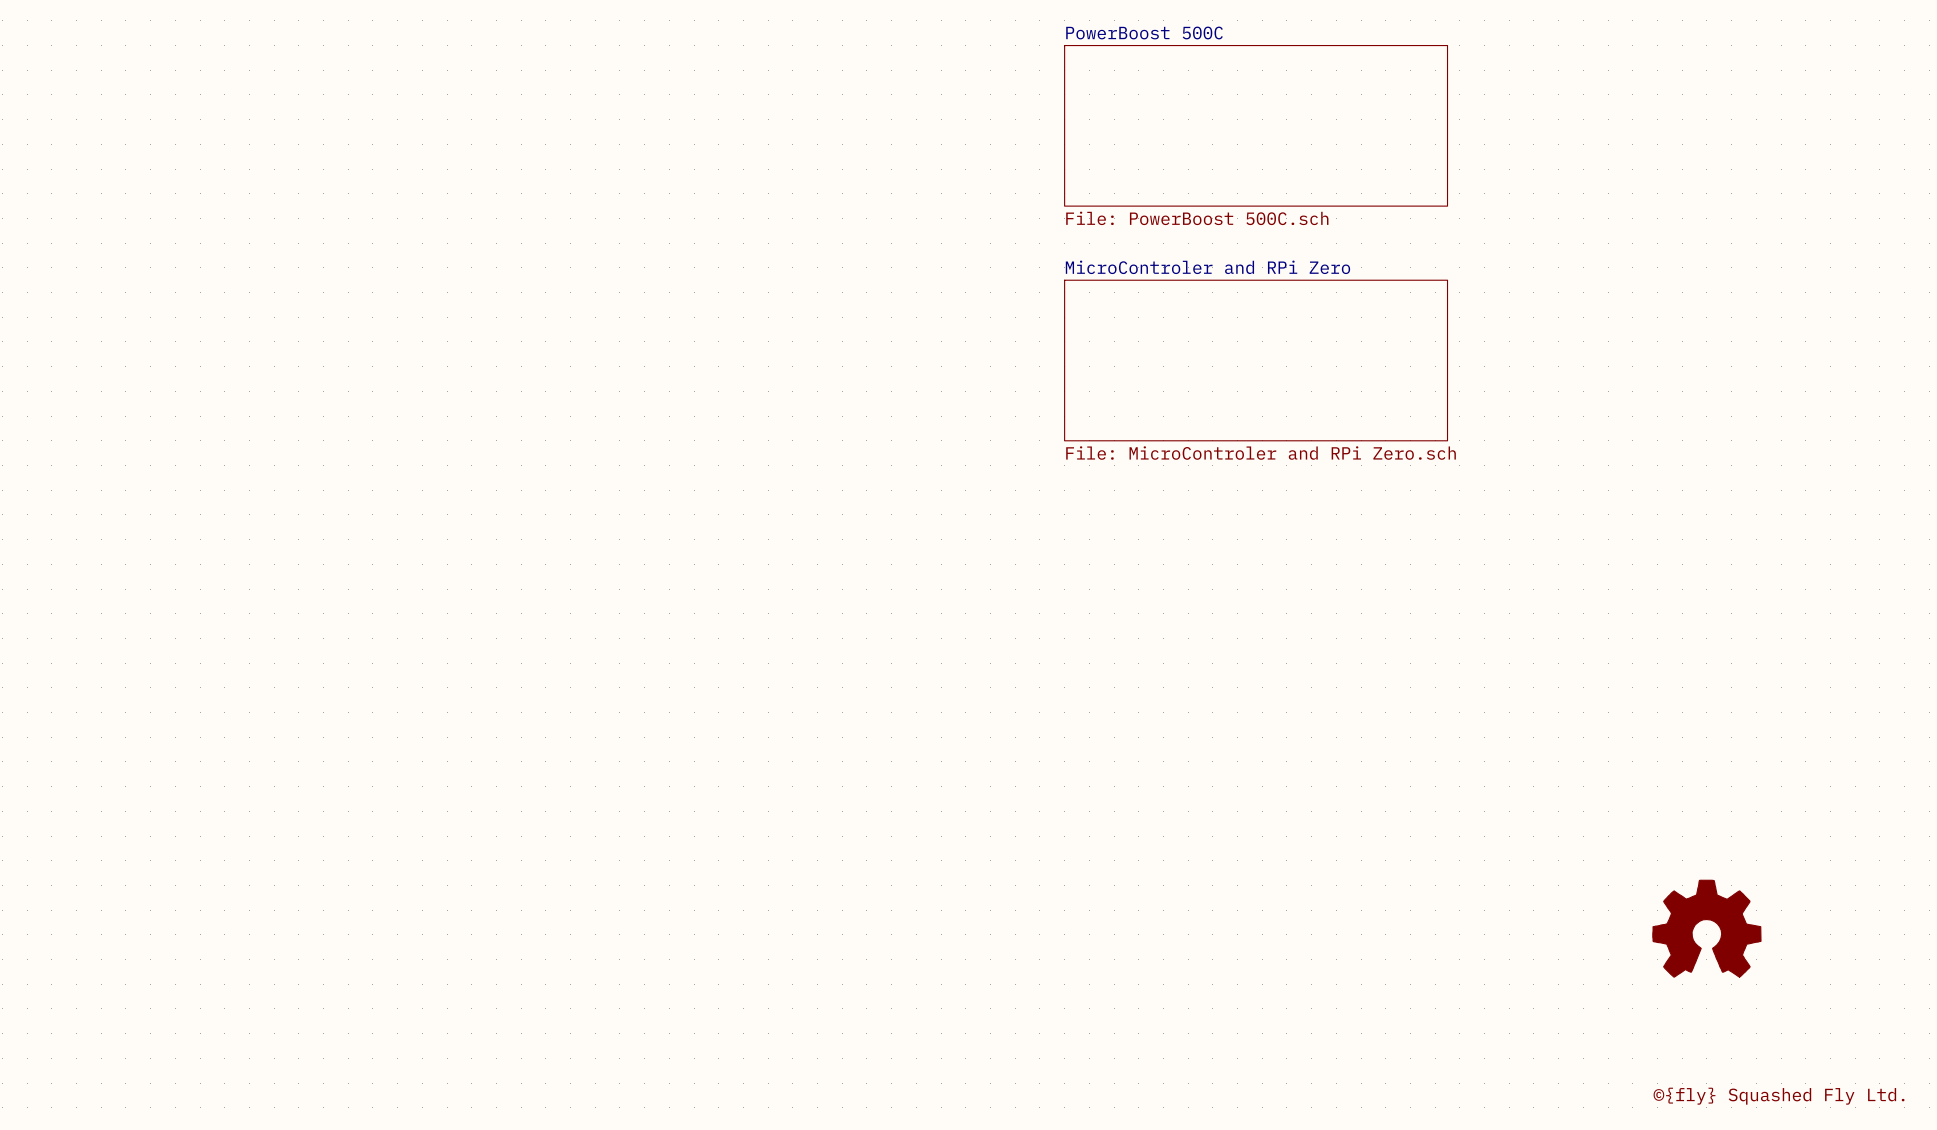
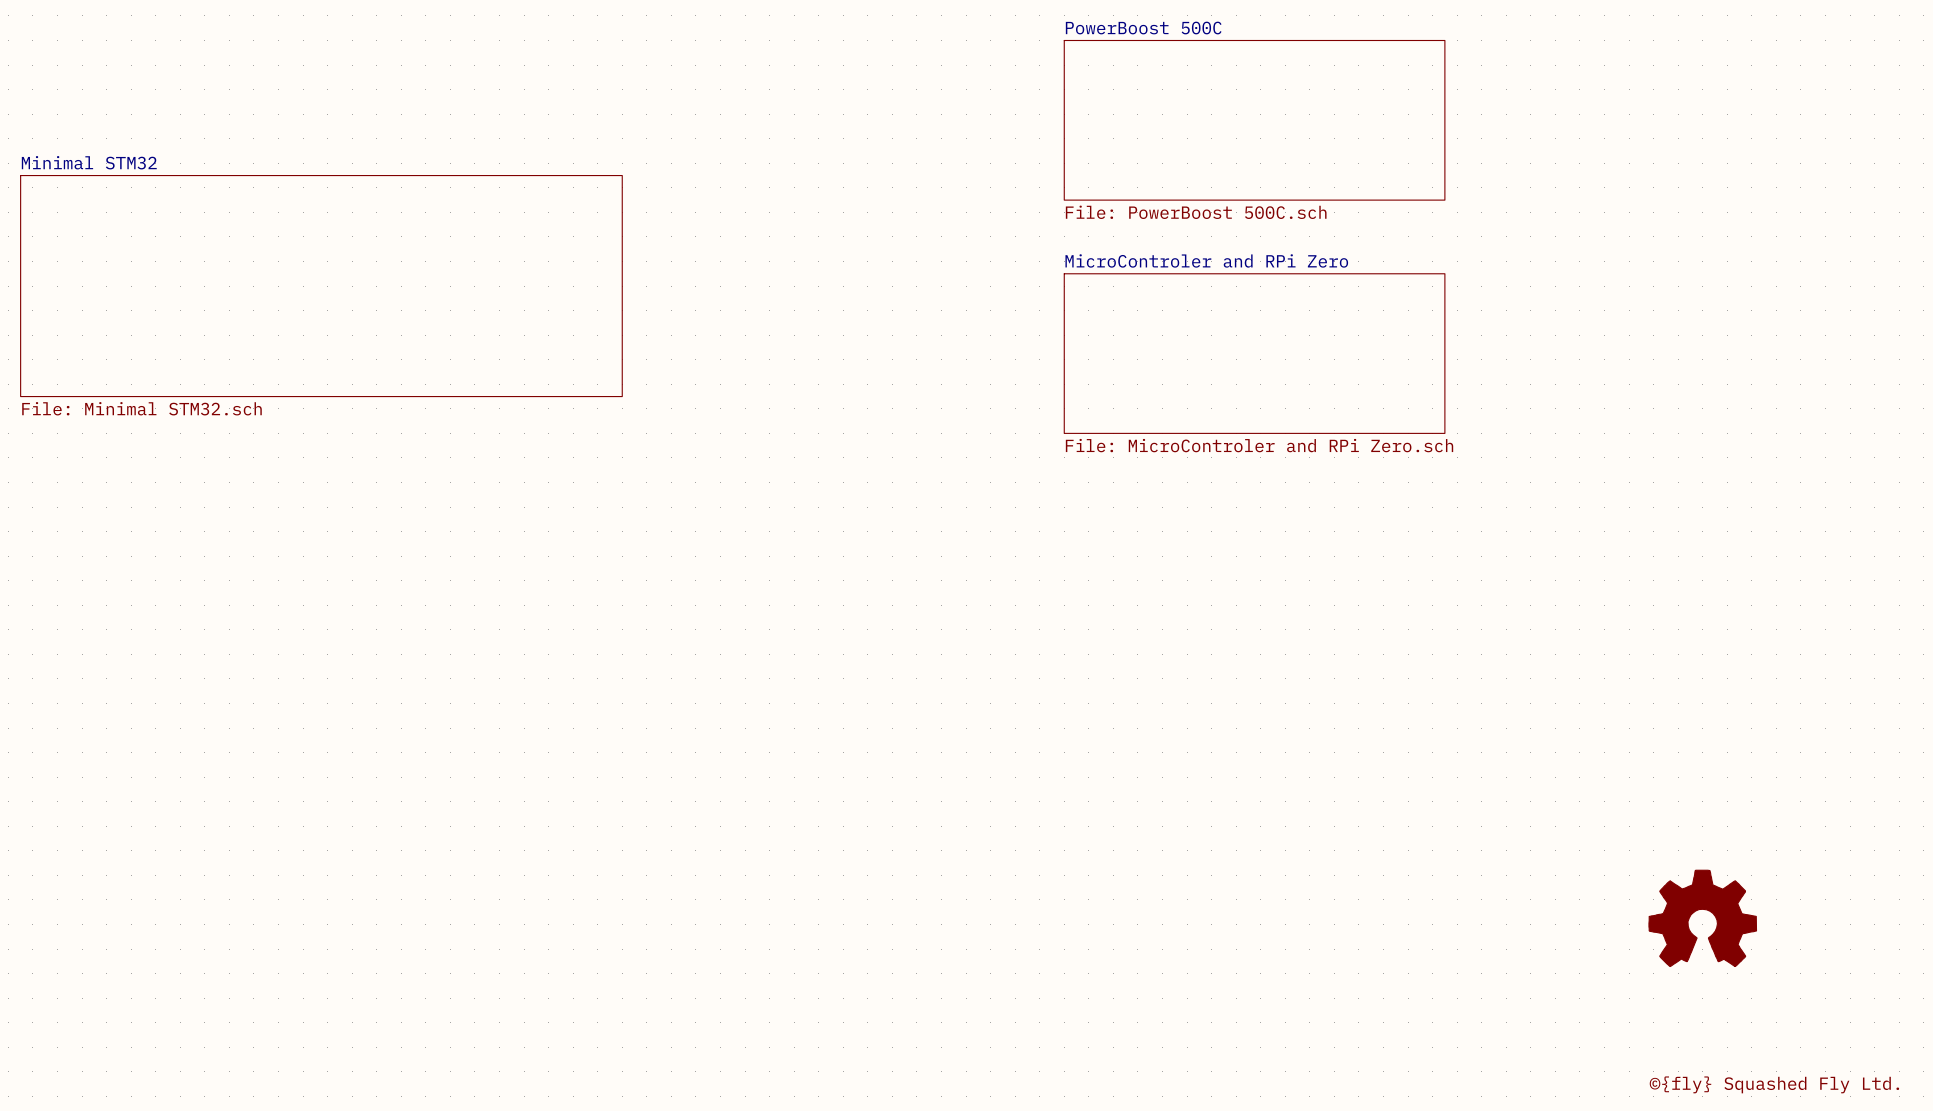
sheet Minimal STM32: none -> File: Minimal STM32.sch (321, 286)

